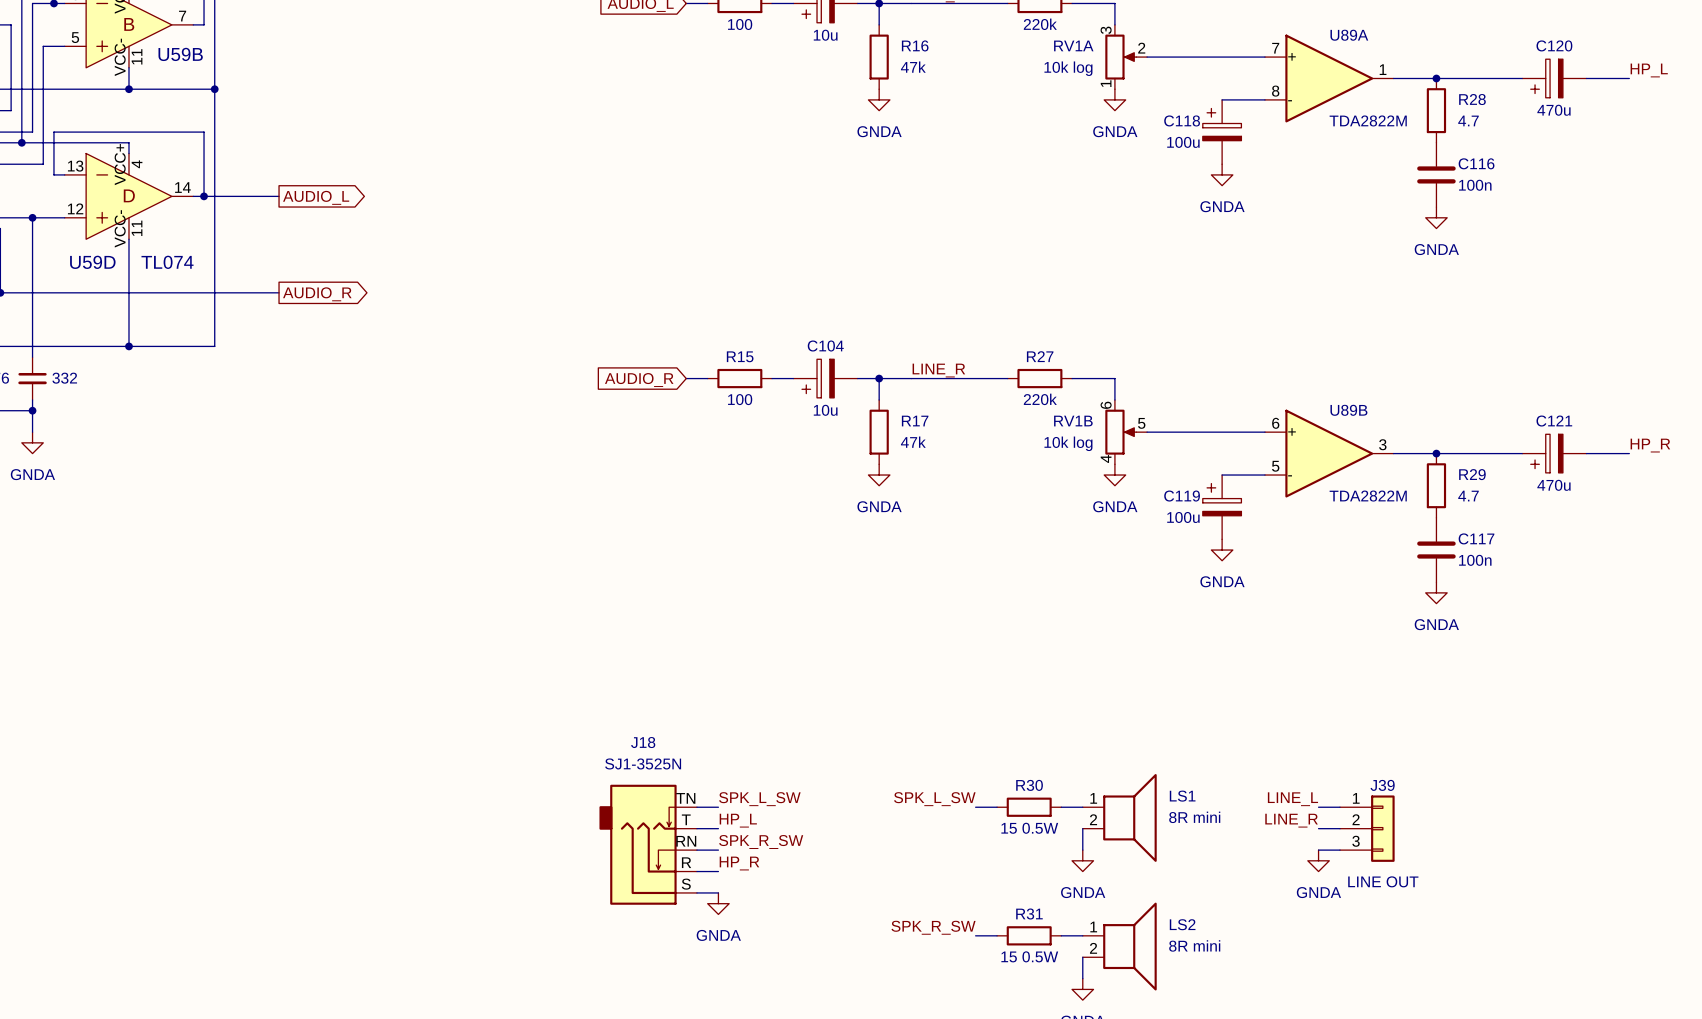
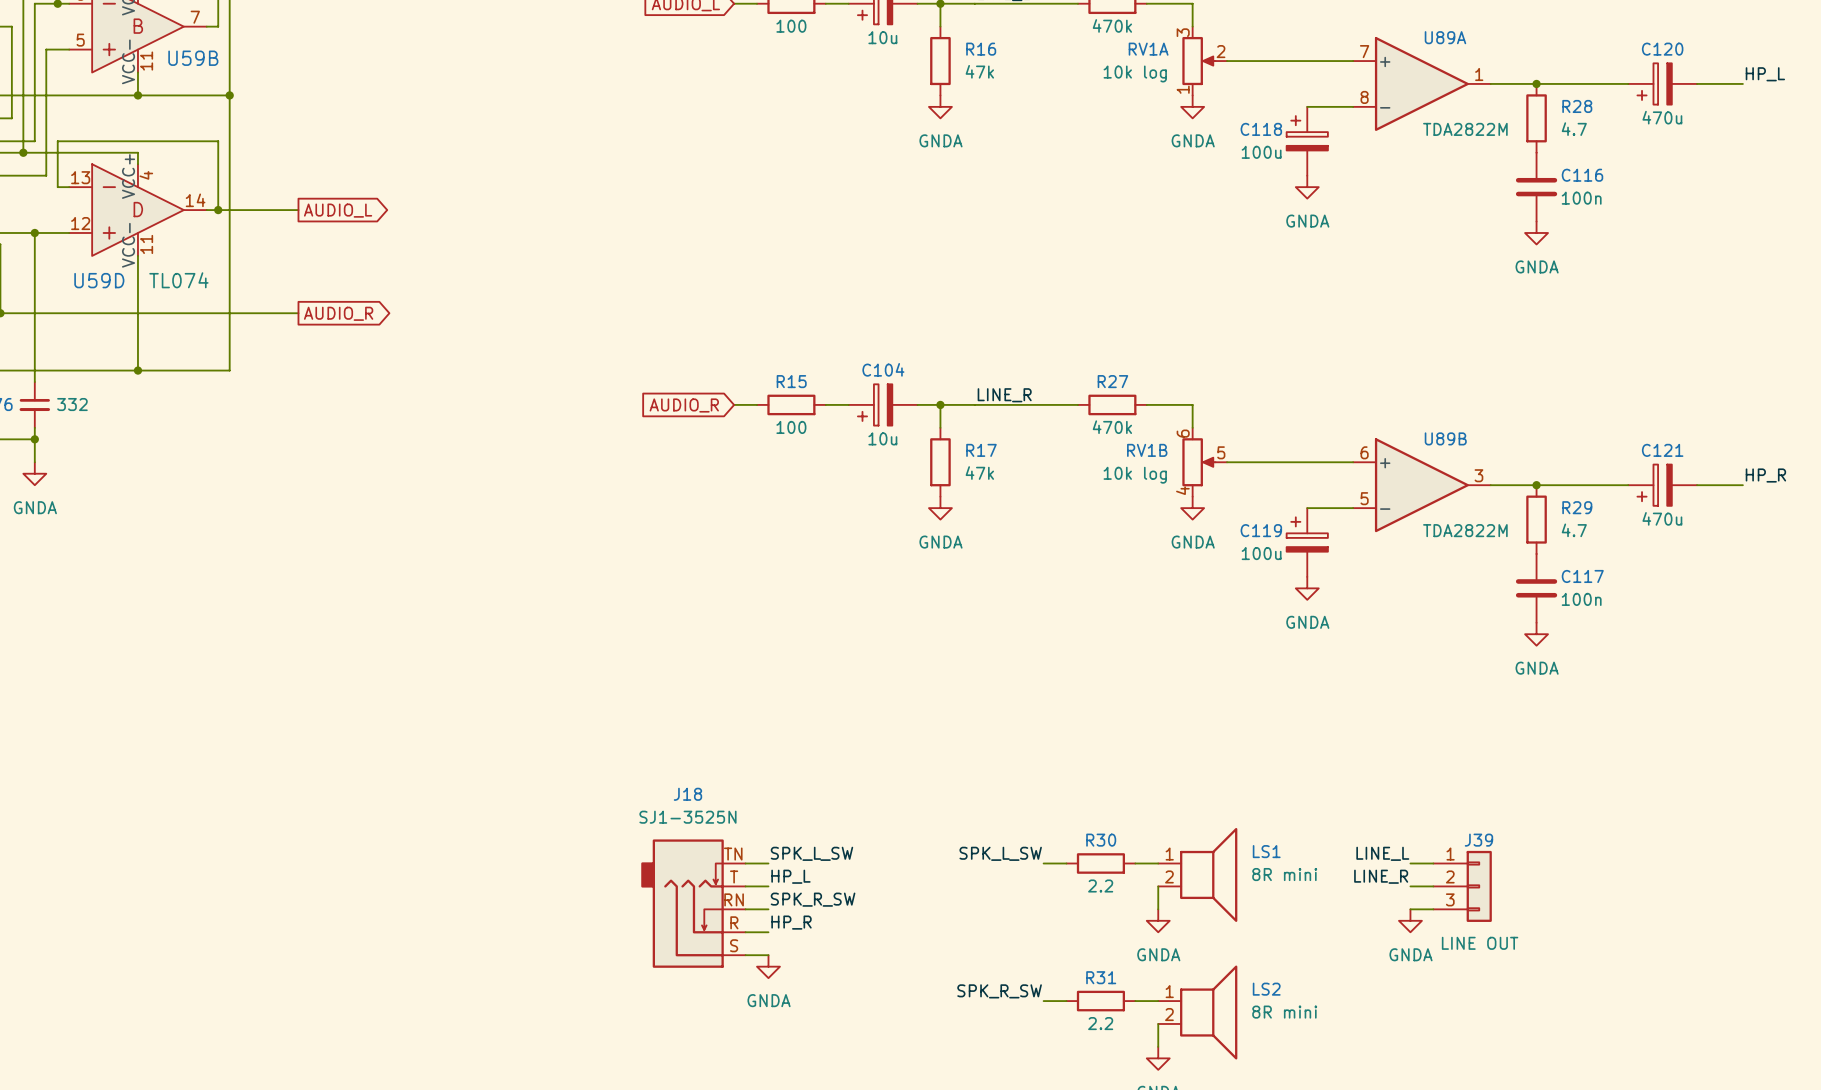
part value: 220k (1040, 24) -> 470k (1112, 25)
R27 value: 220k (1040, 399) -> 470k (1112, 427)
R30 value: 15 0.5W (1029, 828) -> 2.2 (1100, 885)
R31 value: 15 0.5W (1029, 956) -> 2.2 (1100, 1023)

